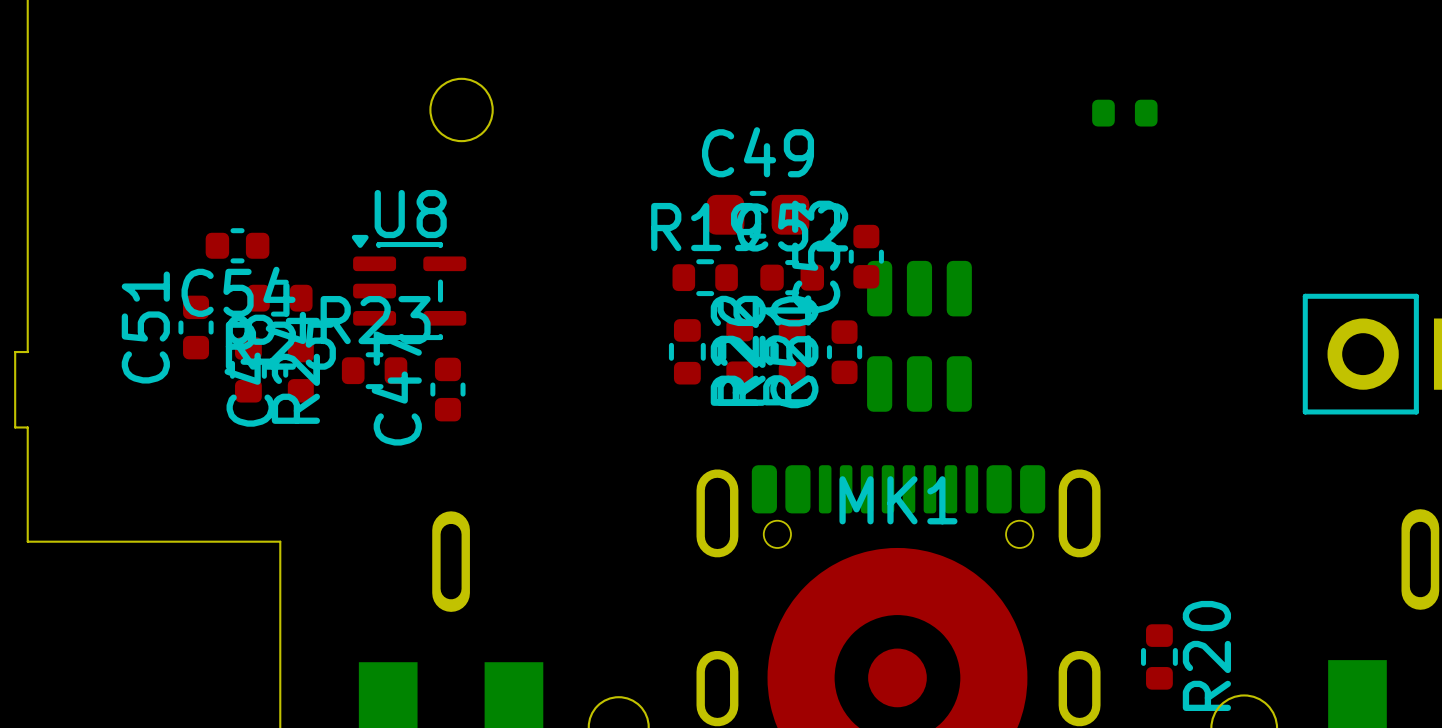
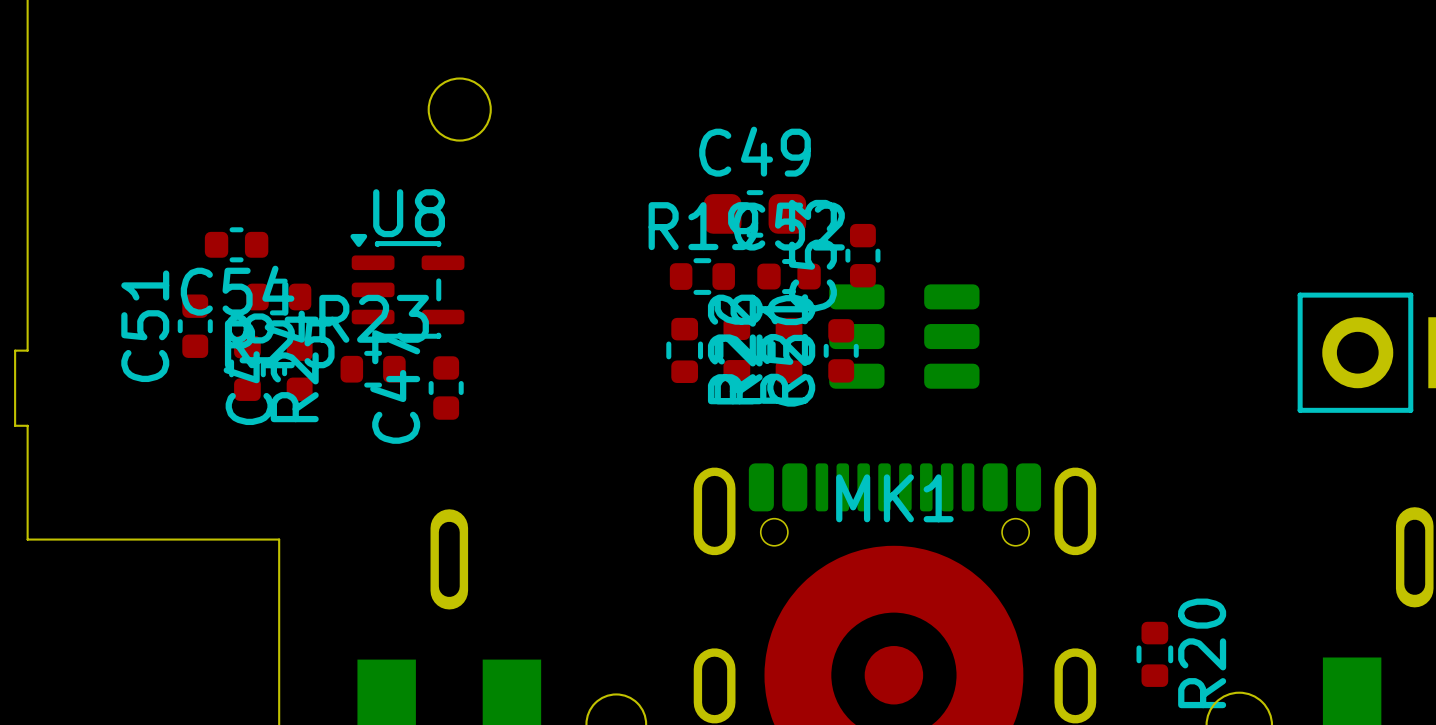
part: (1124, 113) -> none
part rotation: 0° (919, 336) -> 90° clockwise (904, 336)

